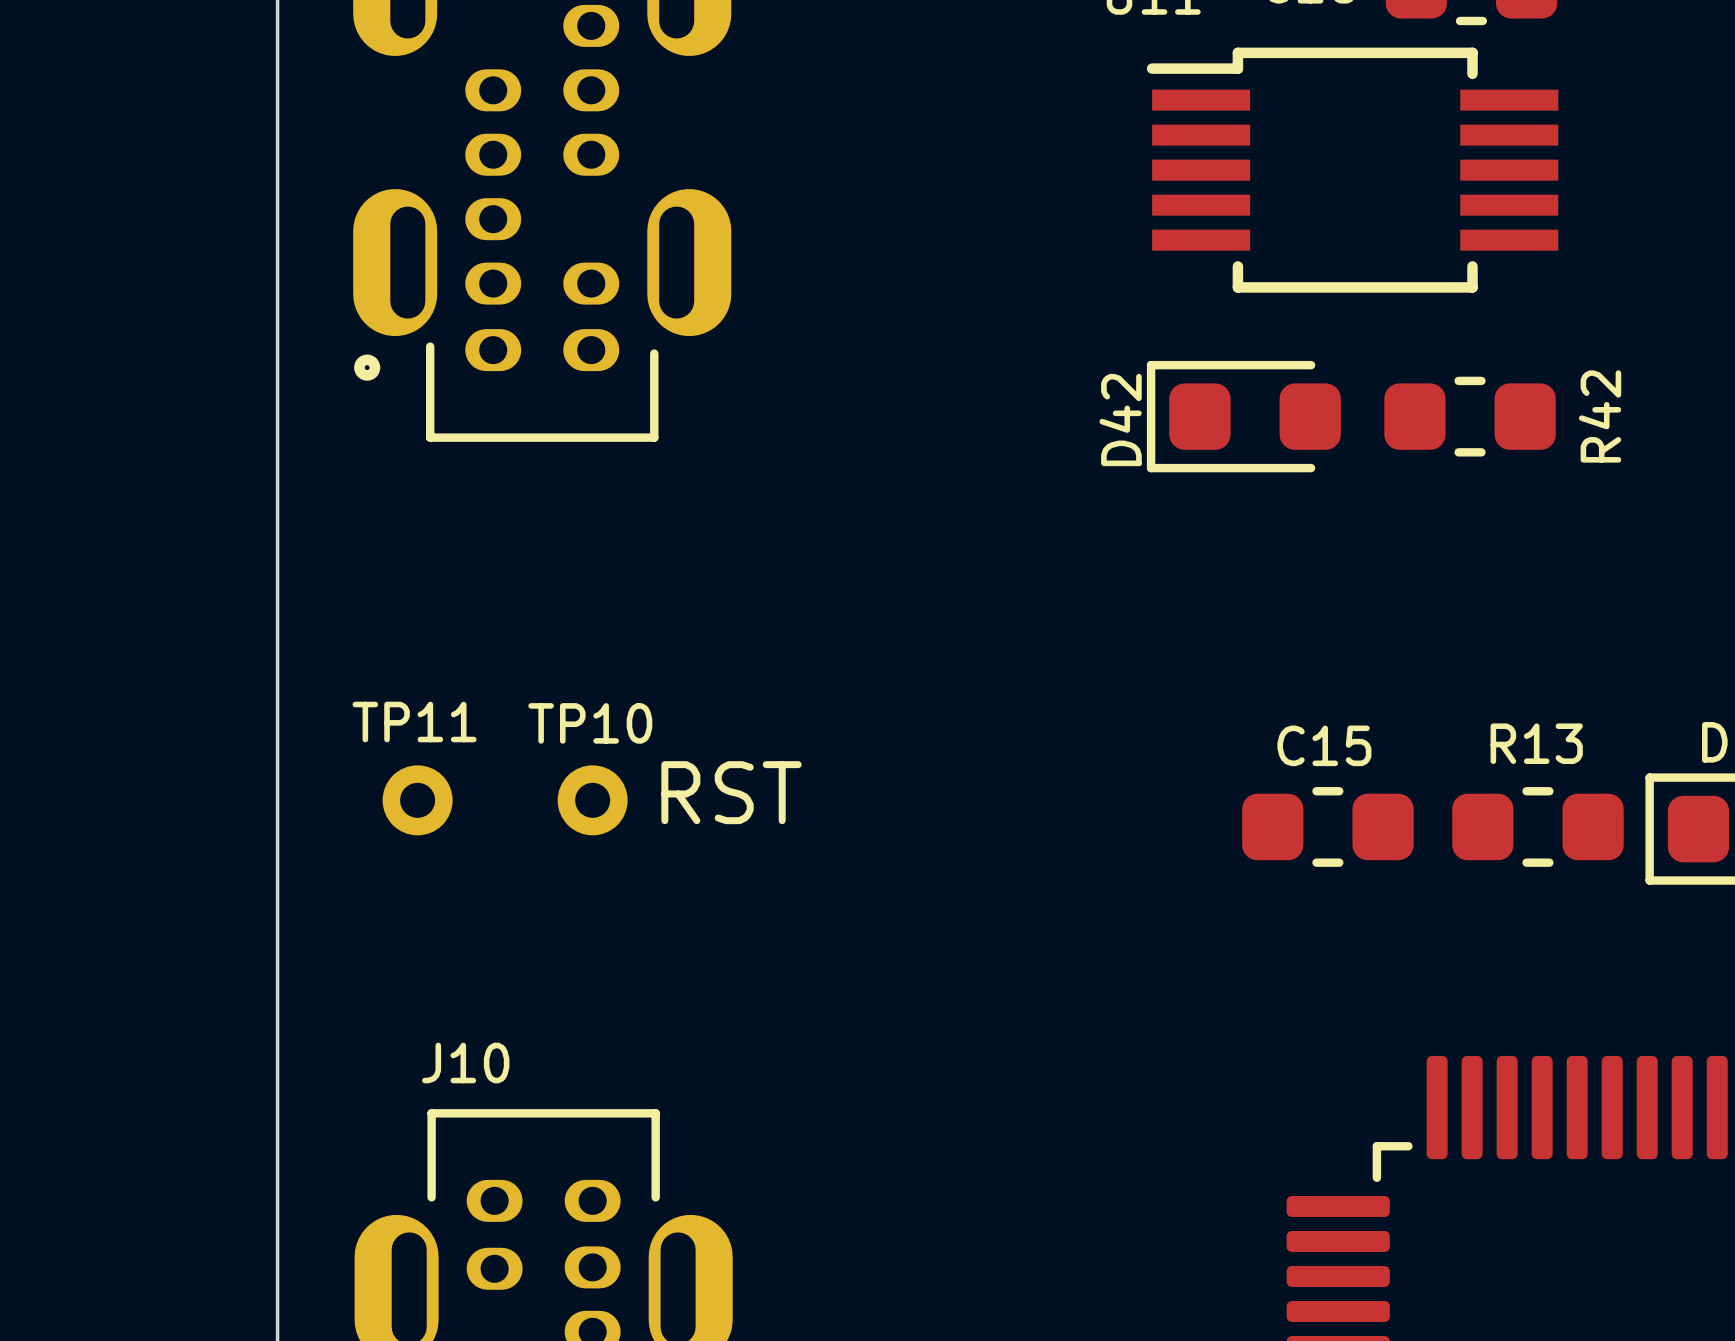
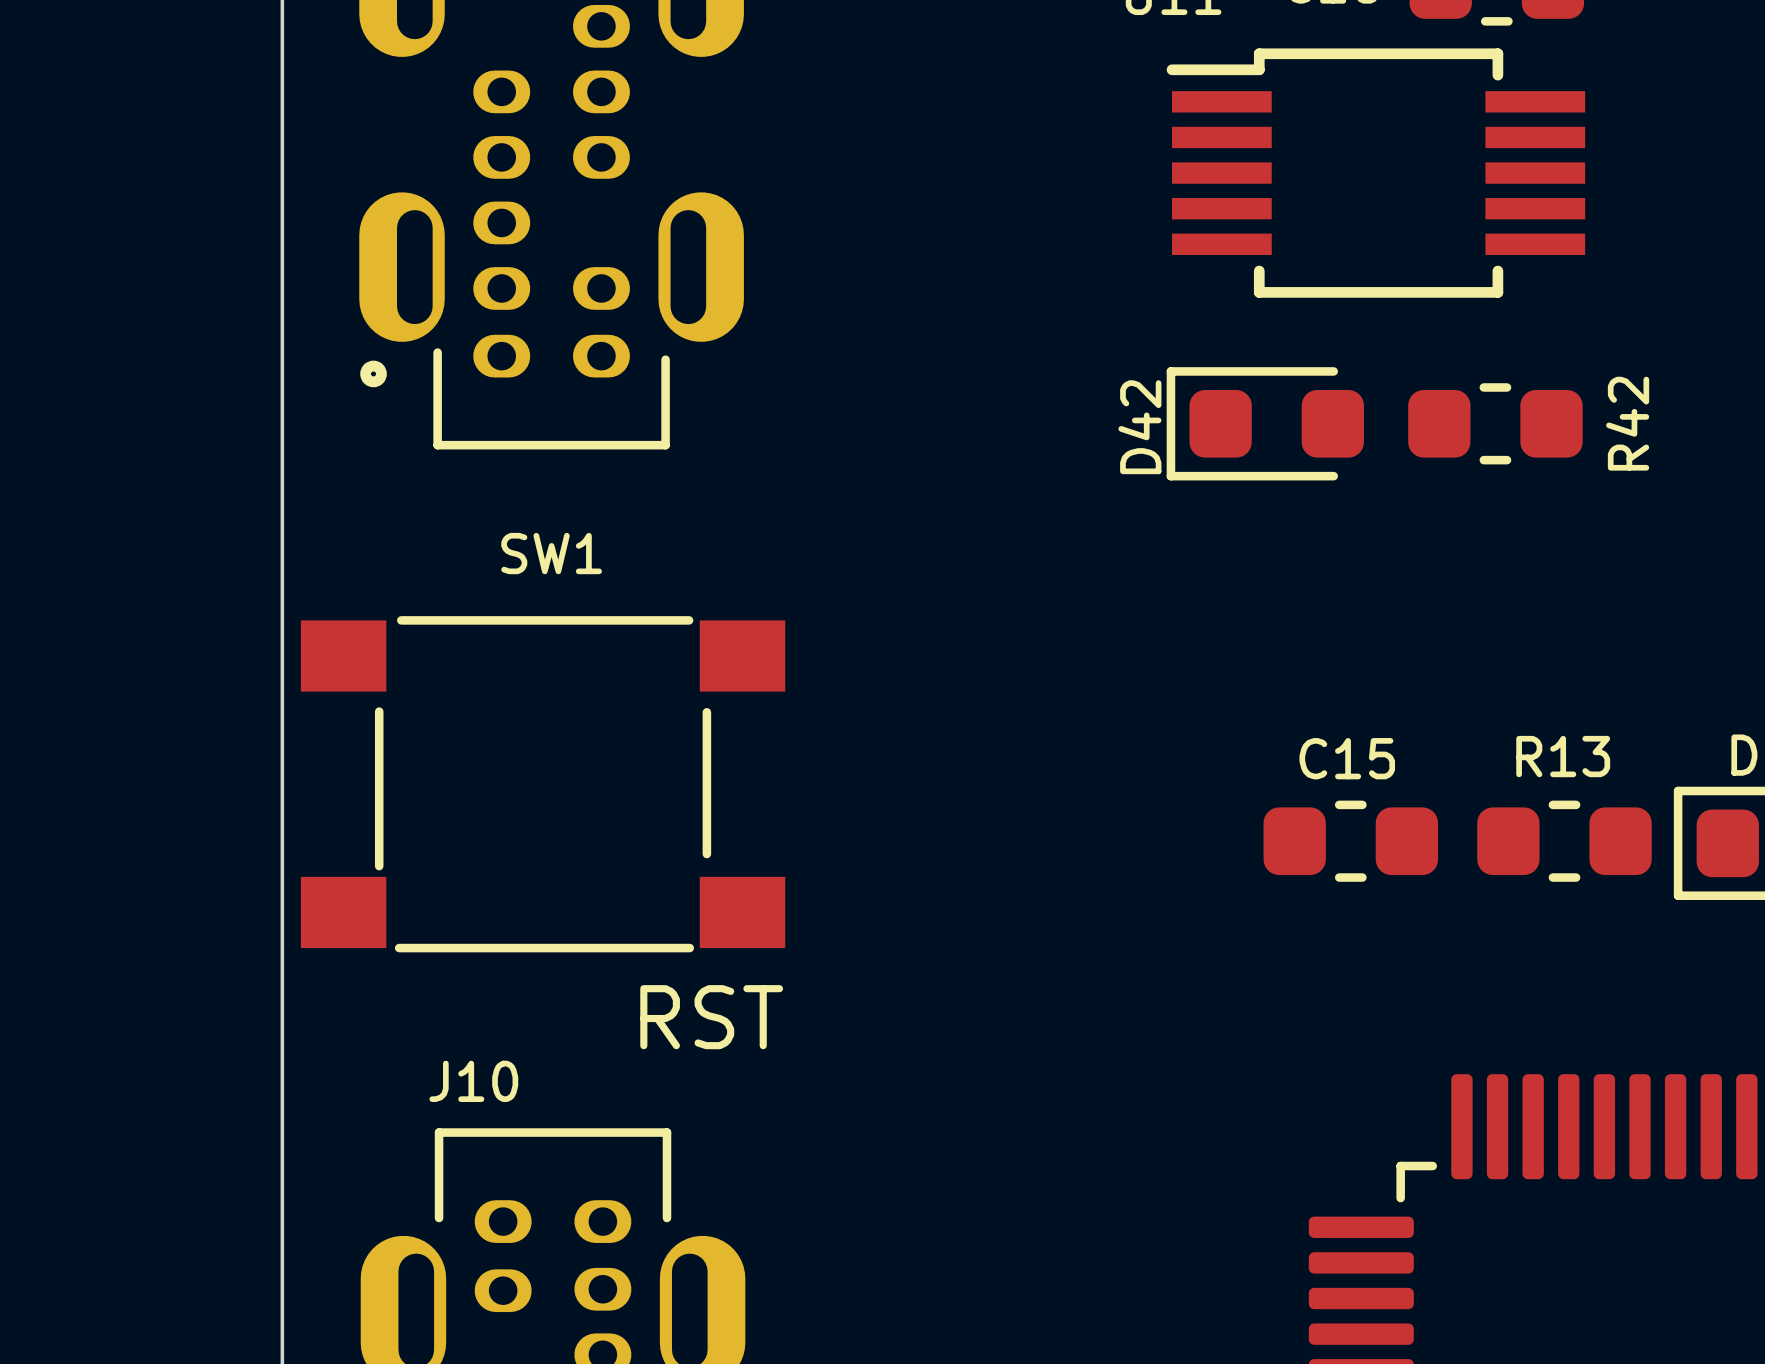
SW1: none -> (543, 784)
text position: RST (731, 792) -> RST (711, 1017)
TP11: (417, 800) -> none
TP10: (592, 800) -> none

